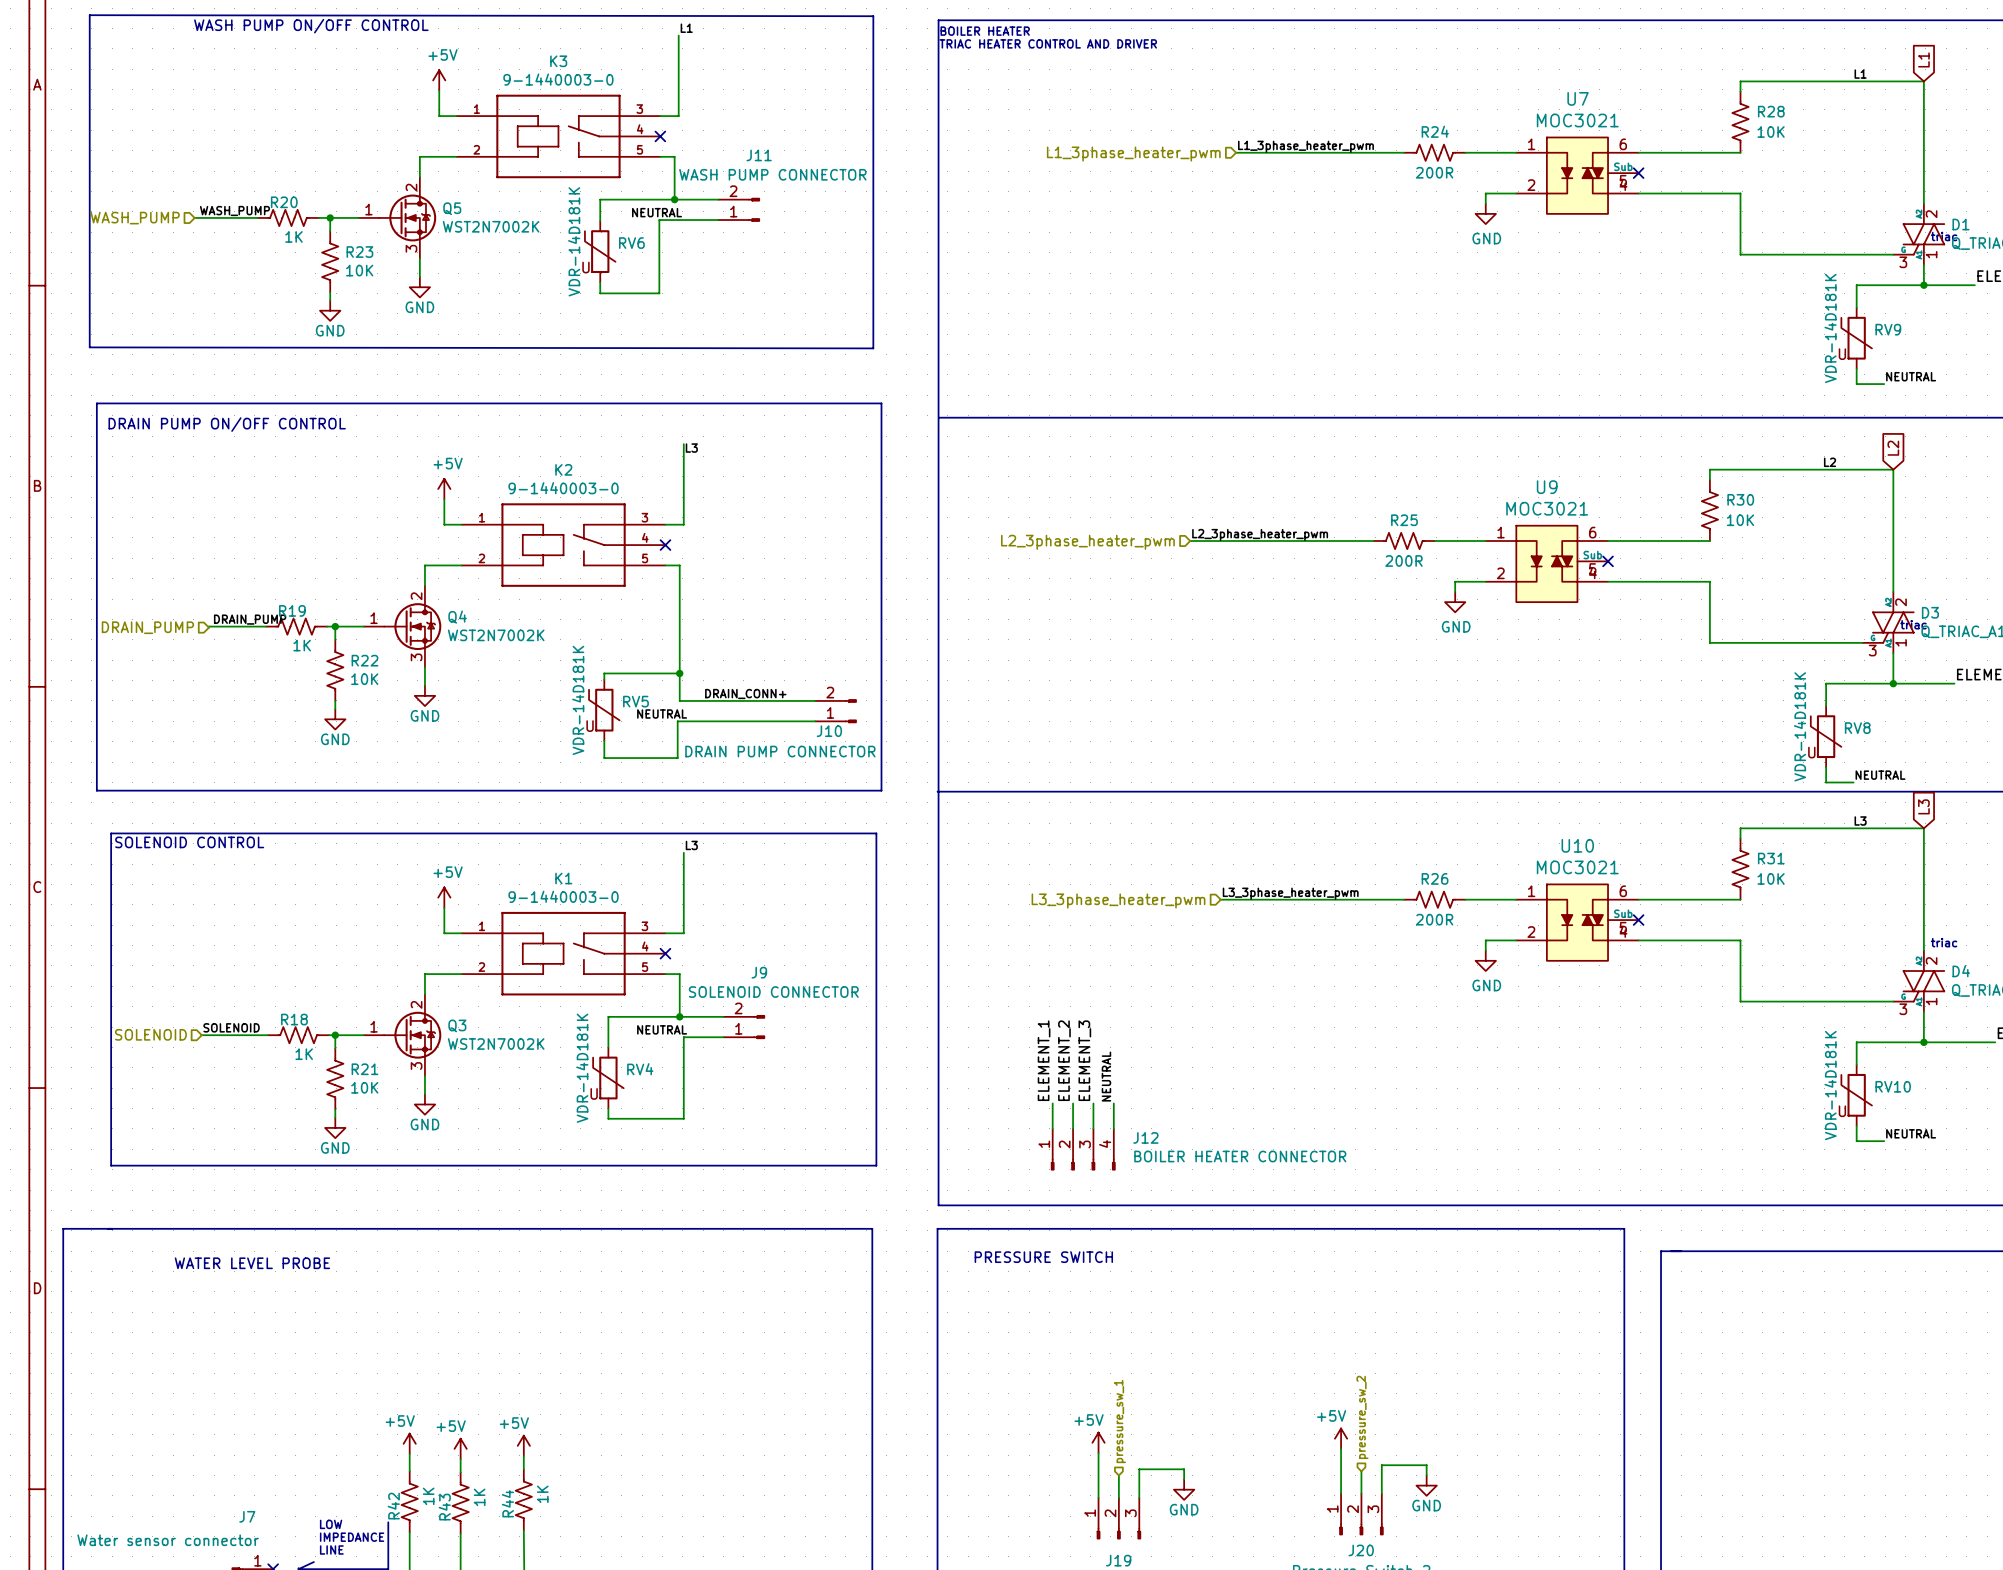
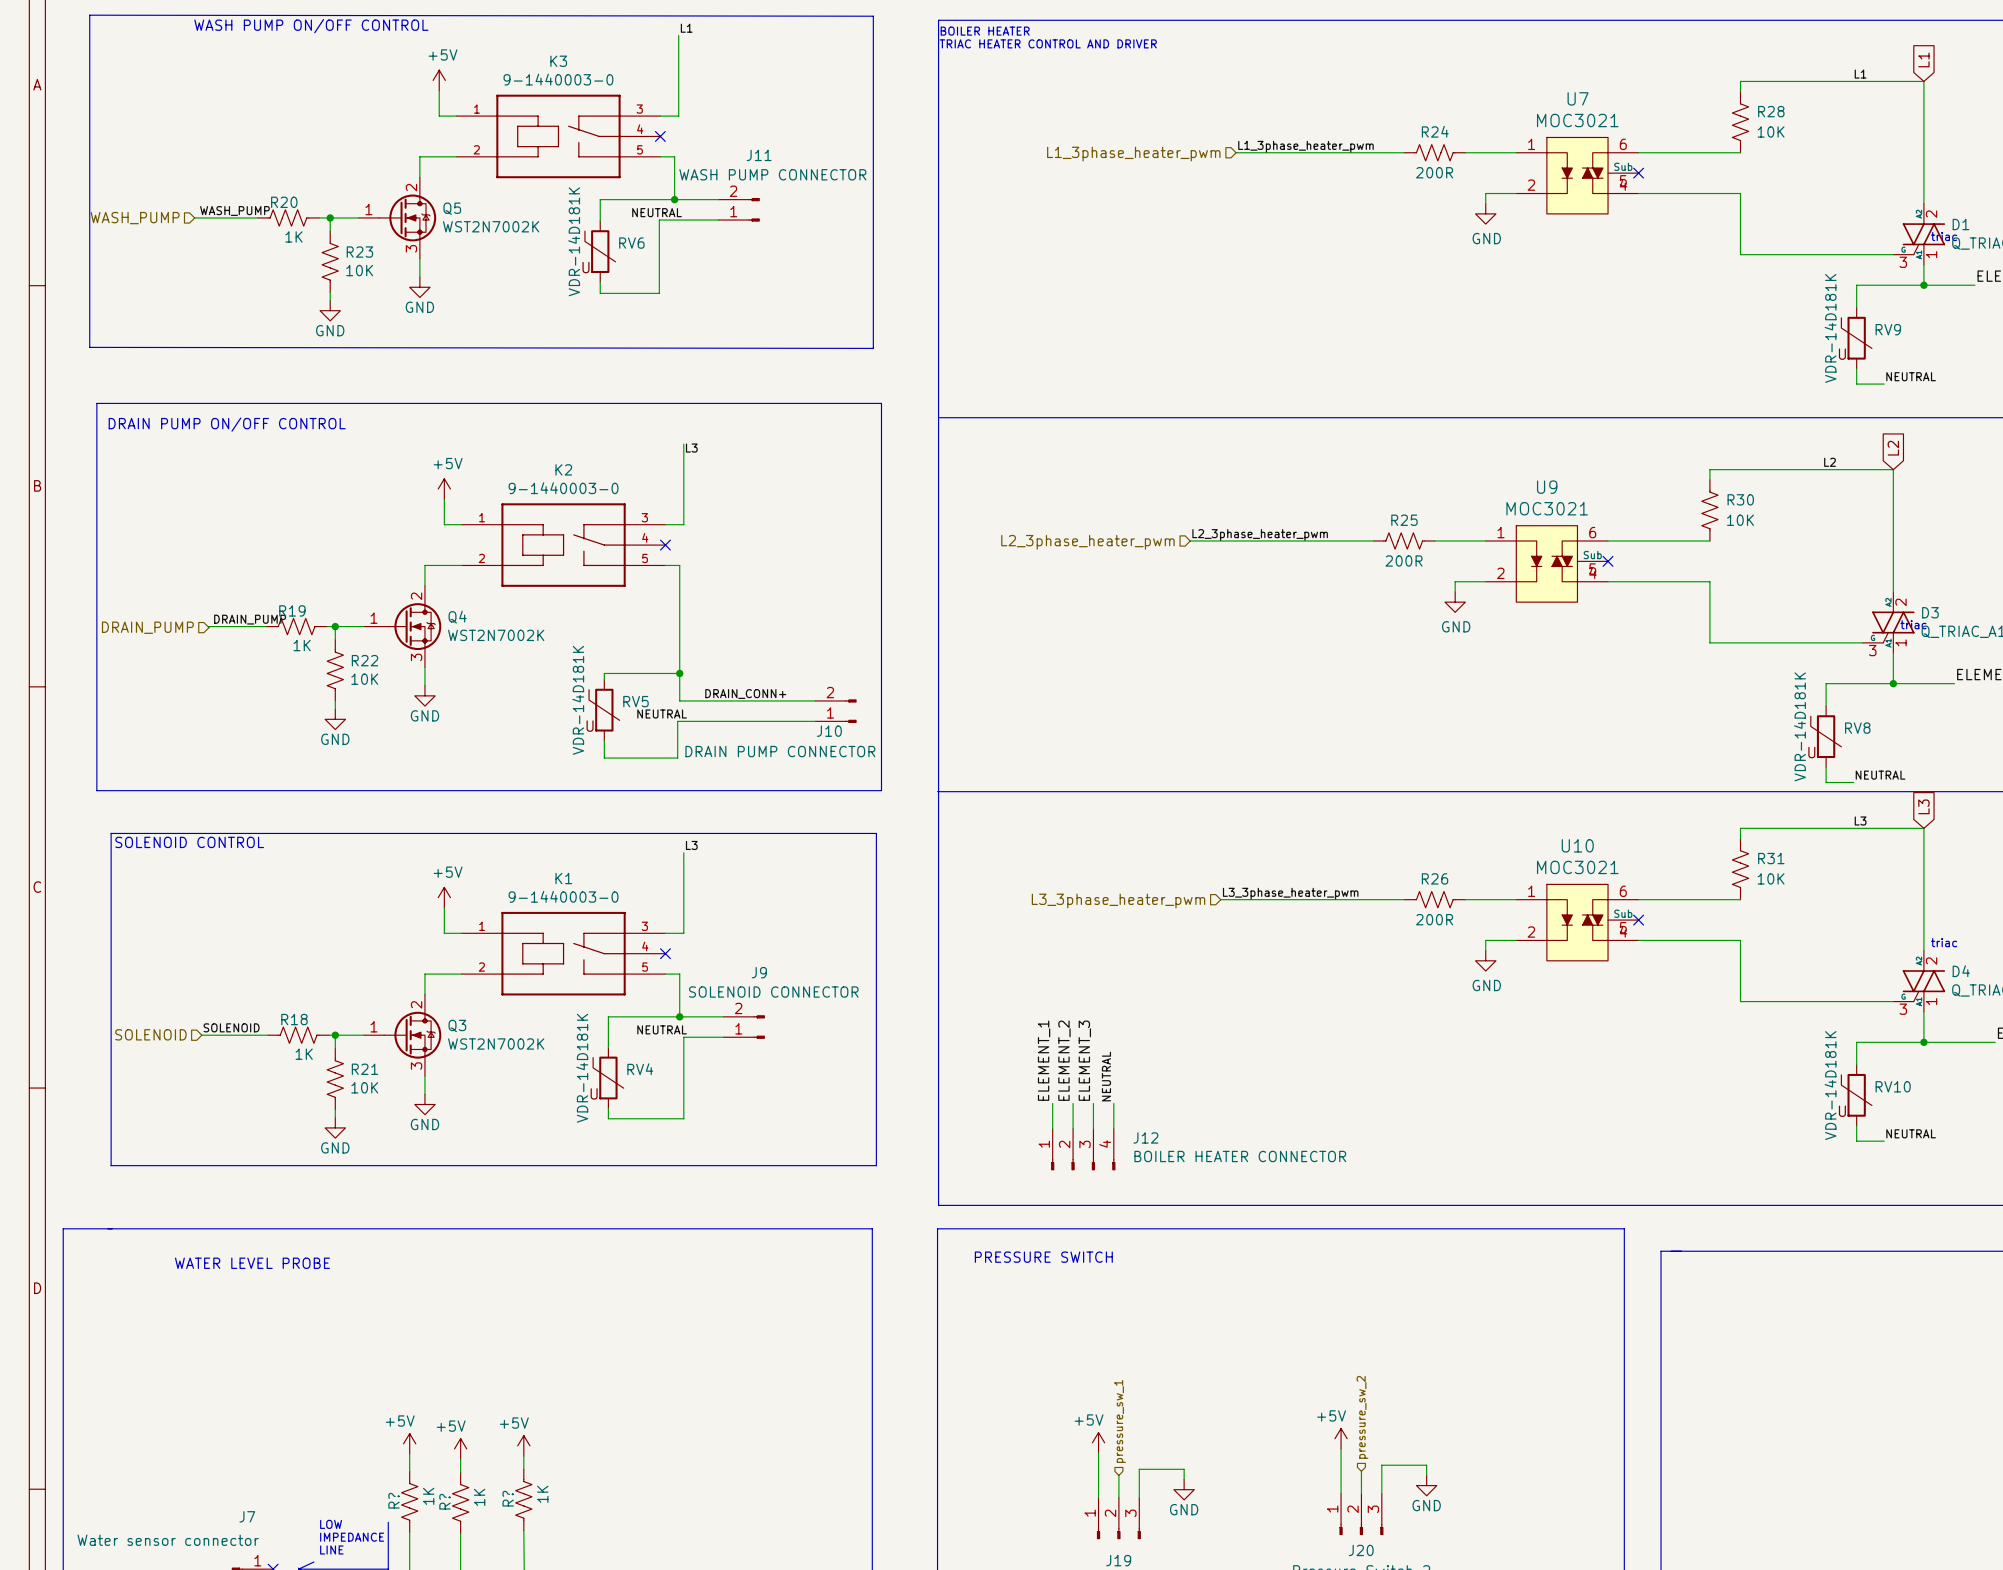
R44 name: R44 (507, 1503) -> R? (508, 1498)
R42 name: R42 (393, 1506) -> R? (394, 1500)
R43 name: R43 (444, 1507) -> R? (444, 1501)

